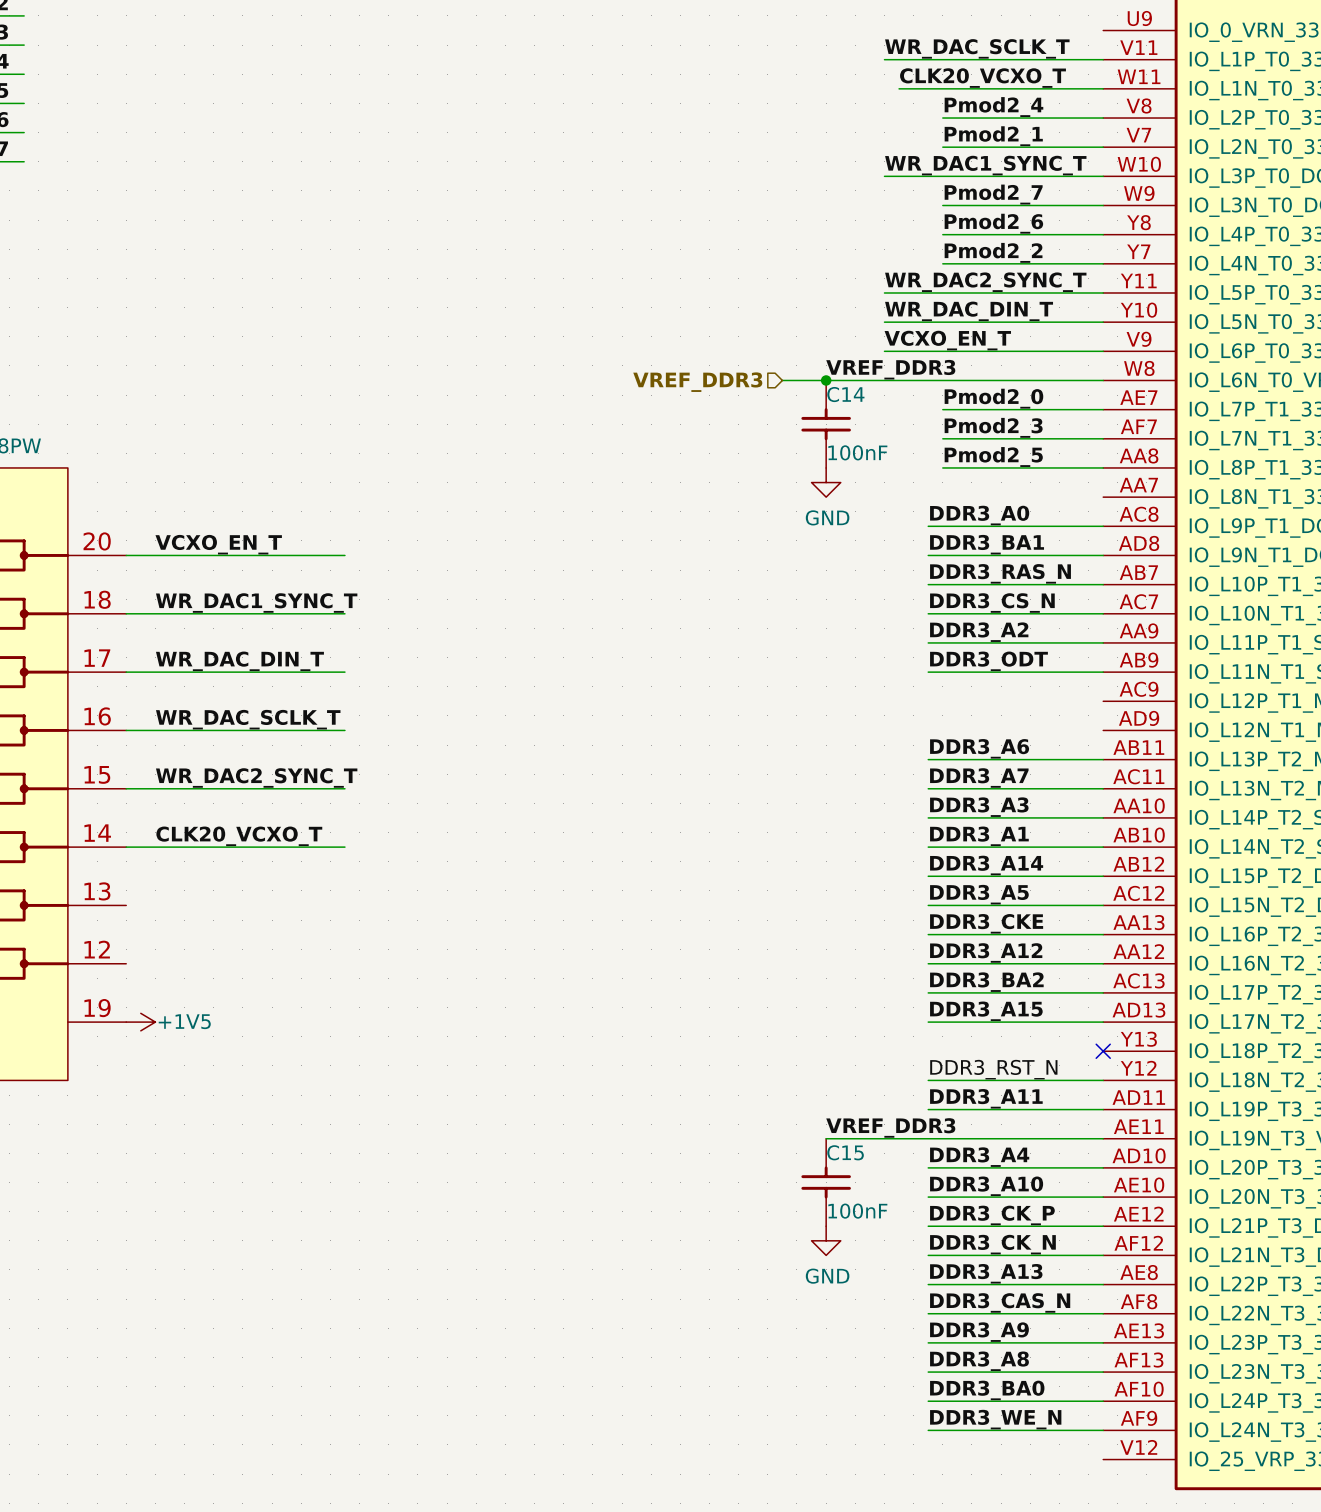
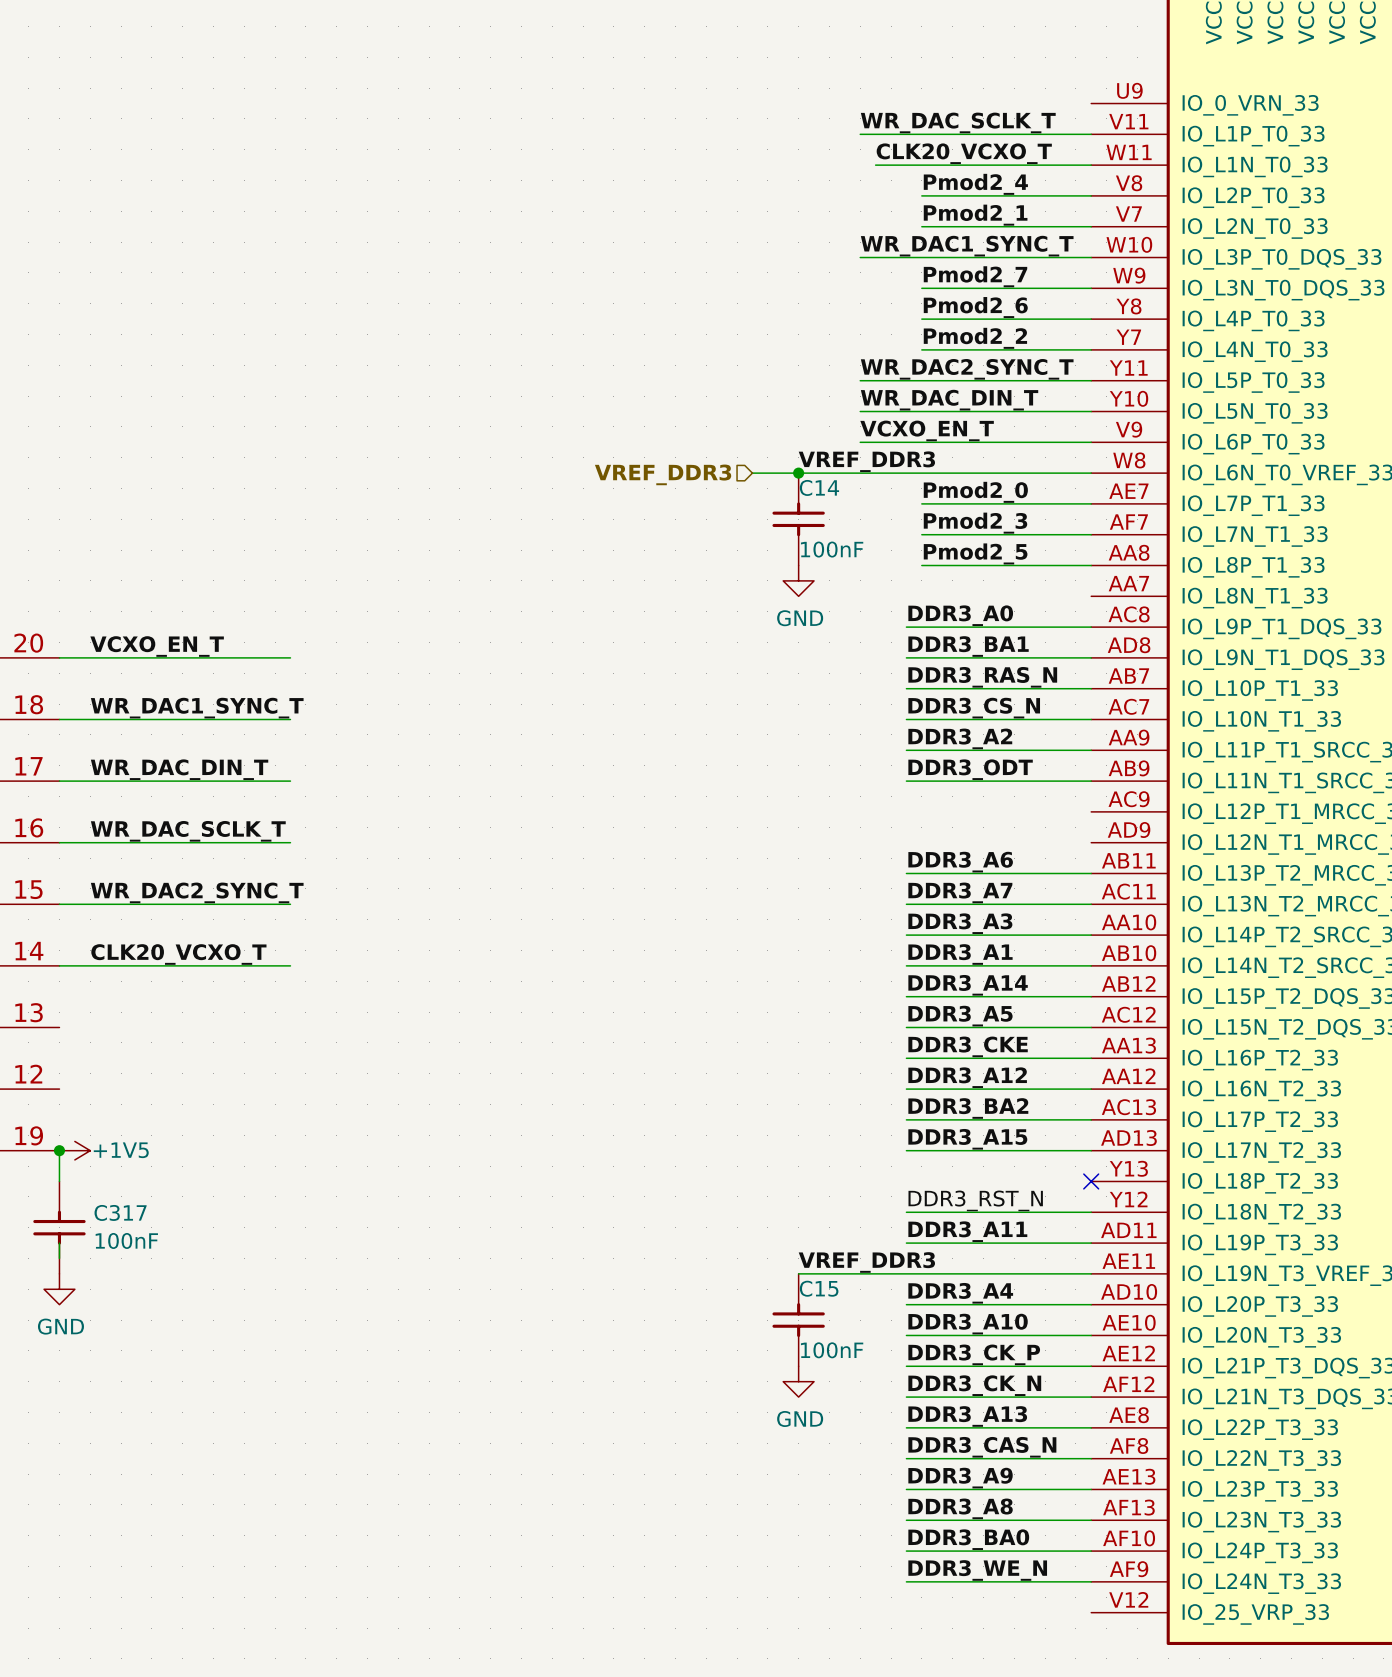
wire: none -> (59, 1150) (59, 1181)
junction: none -> (59, 1150)
C317: none -> (59, 1227)
wire: none -> (59, 1243) (59, 1258)
power symbol: none -> GND (59, 1289)

